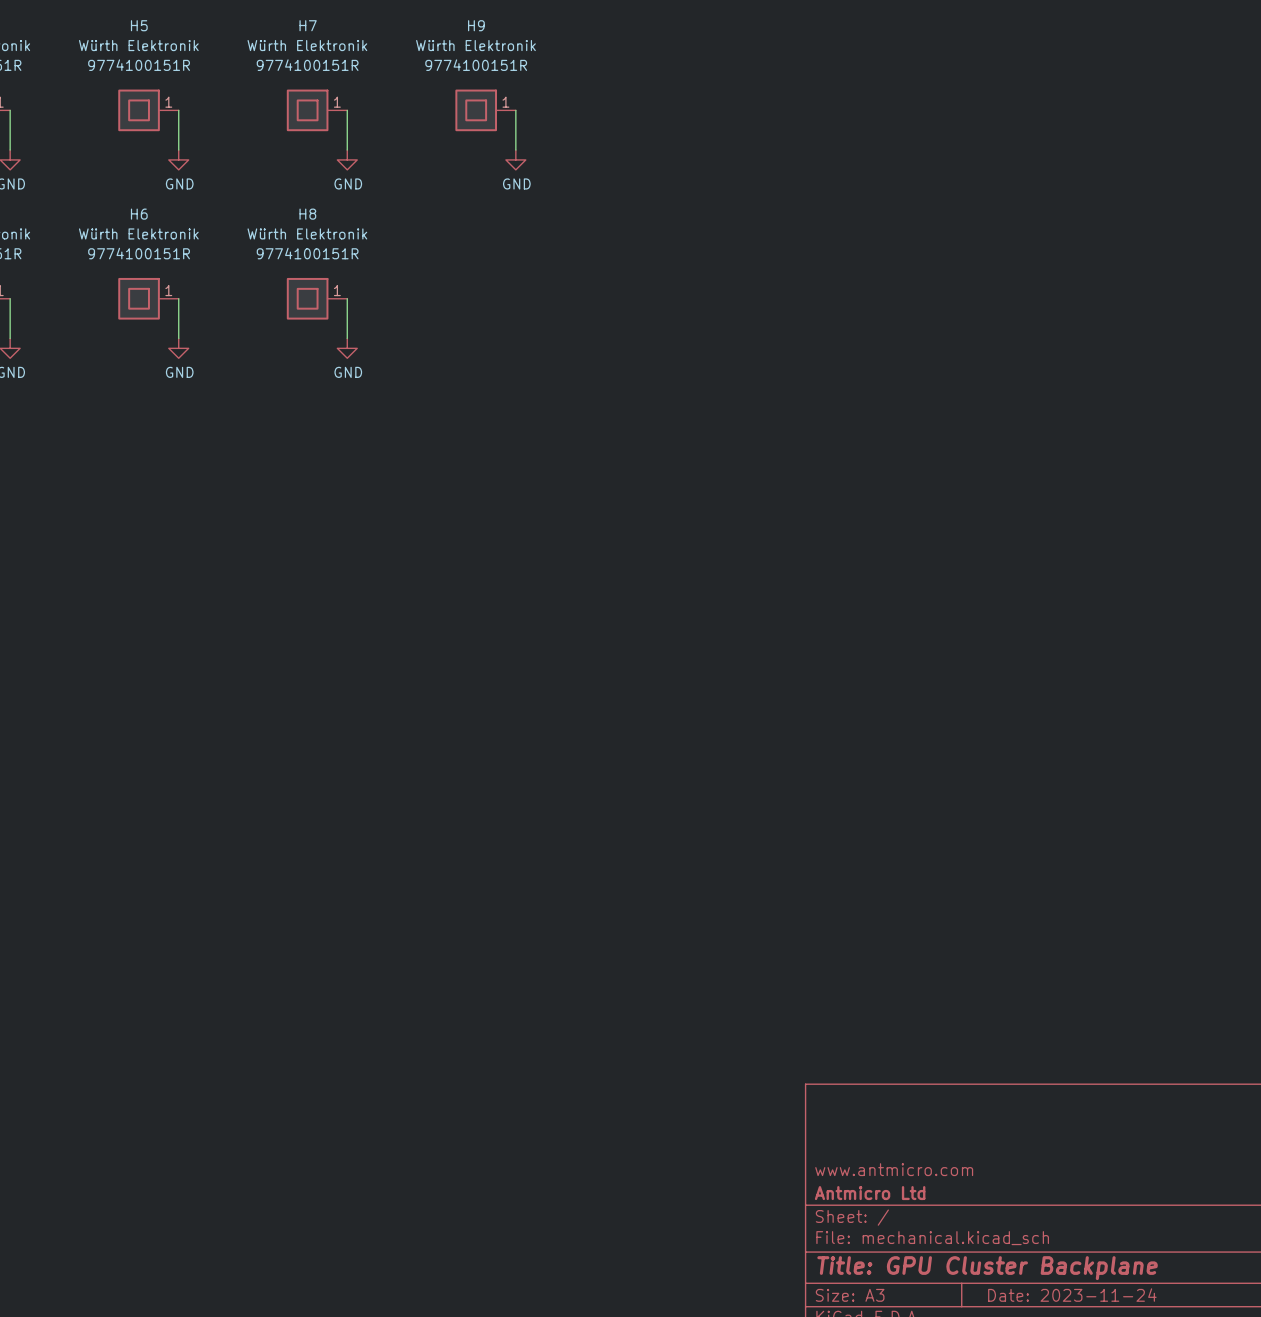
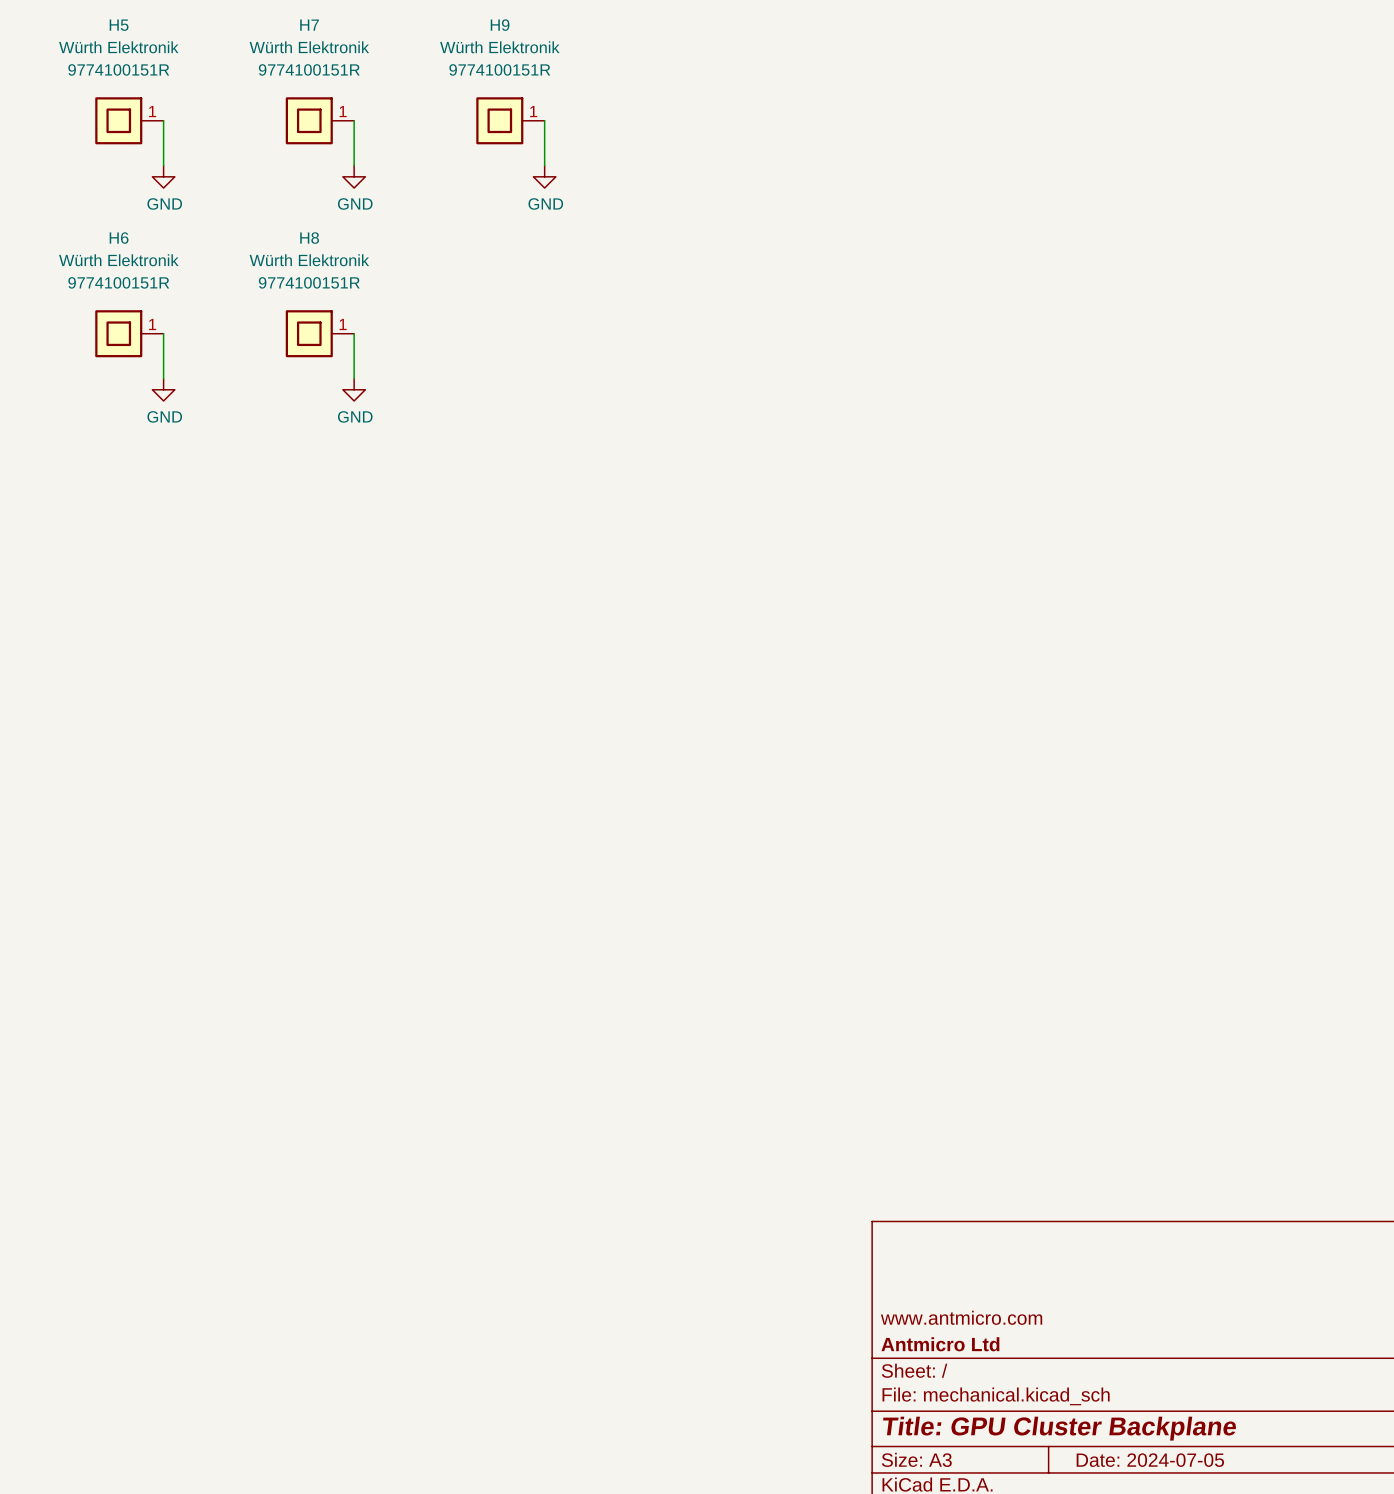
title block: Date: 2023-11-24 (1072, 1295) -> Date: 2024-07-05 (1150, 1460)

